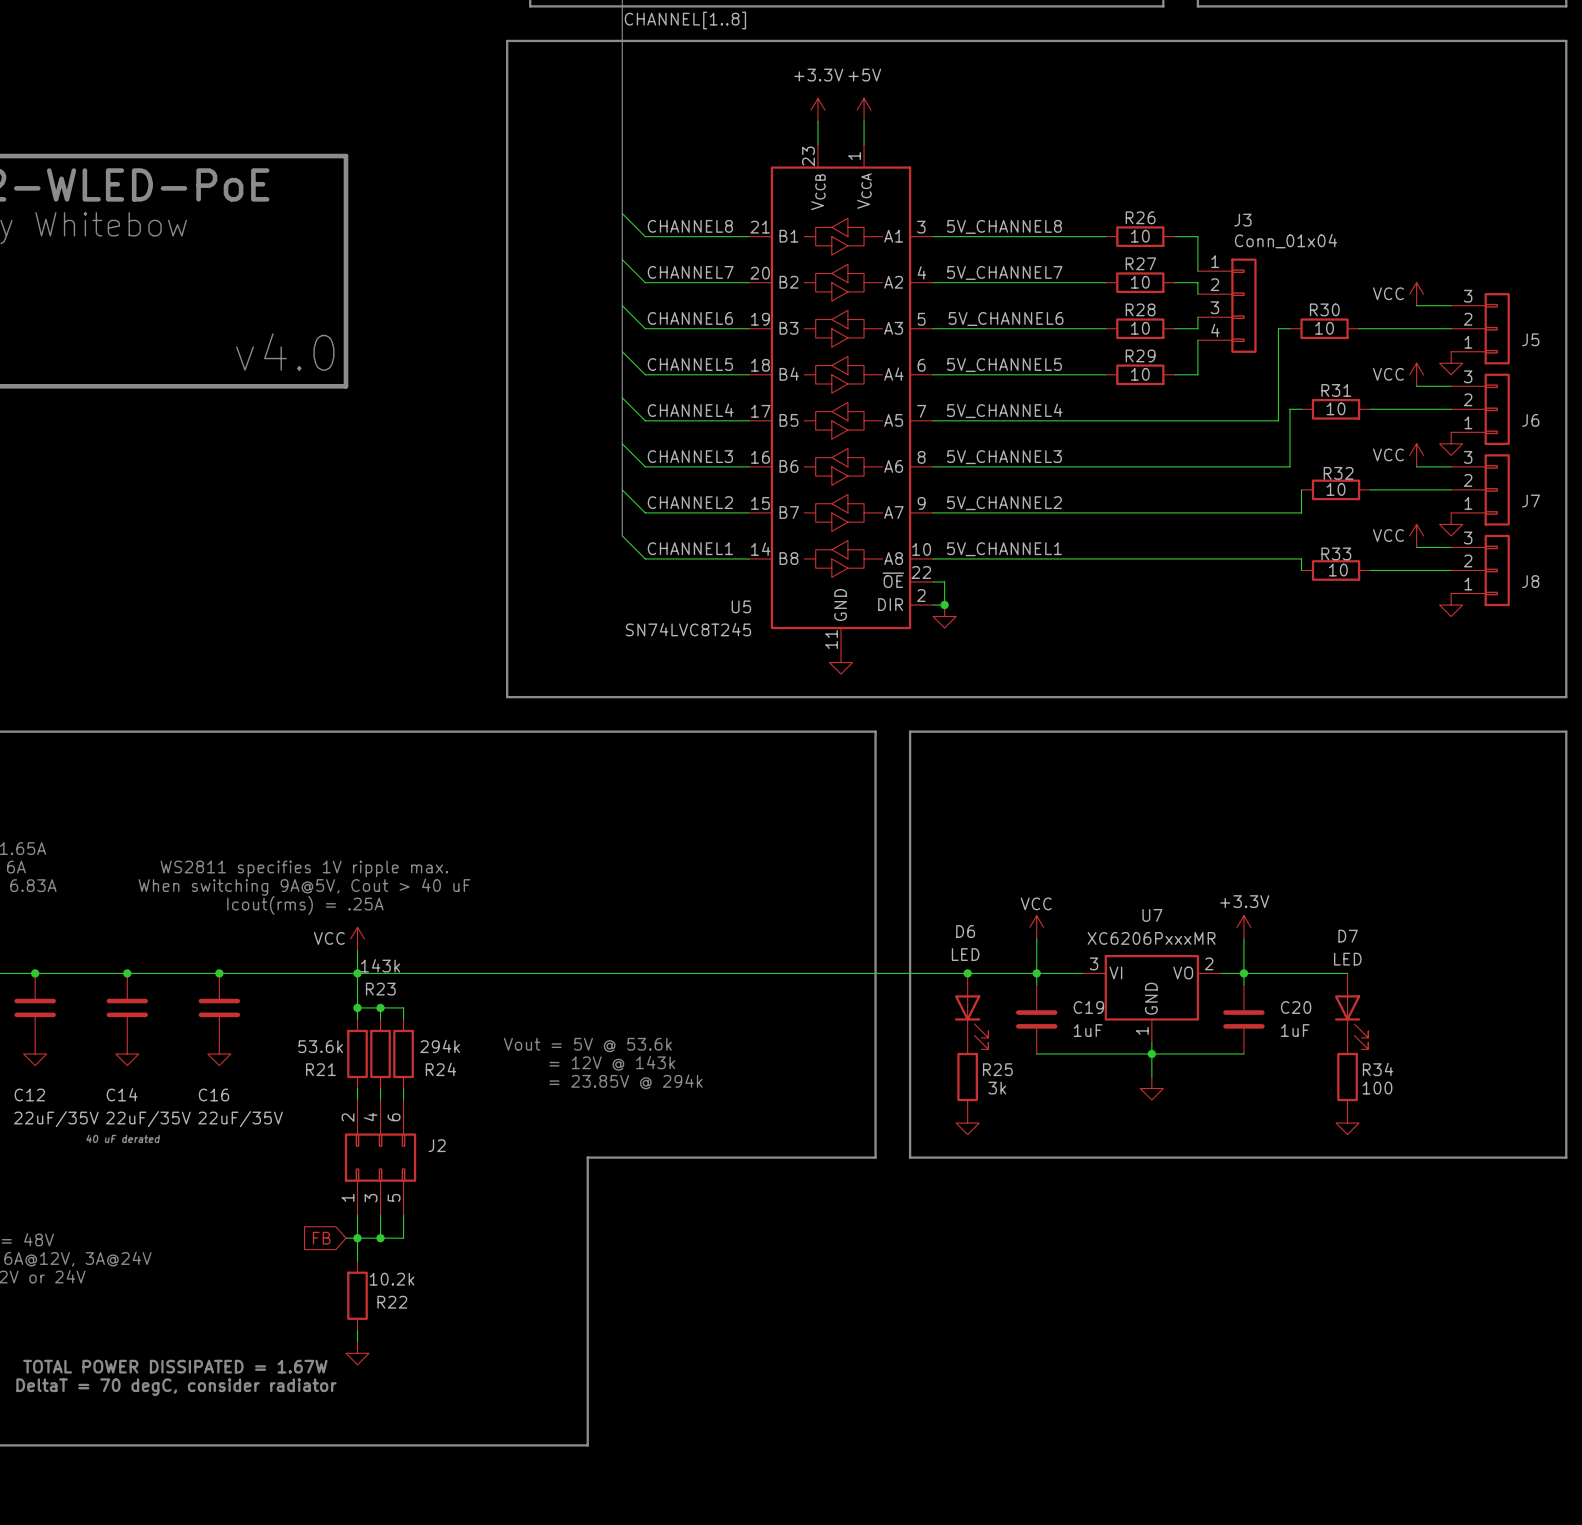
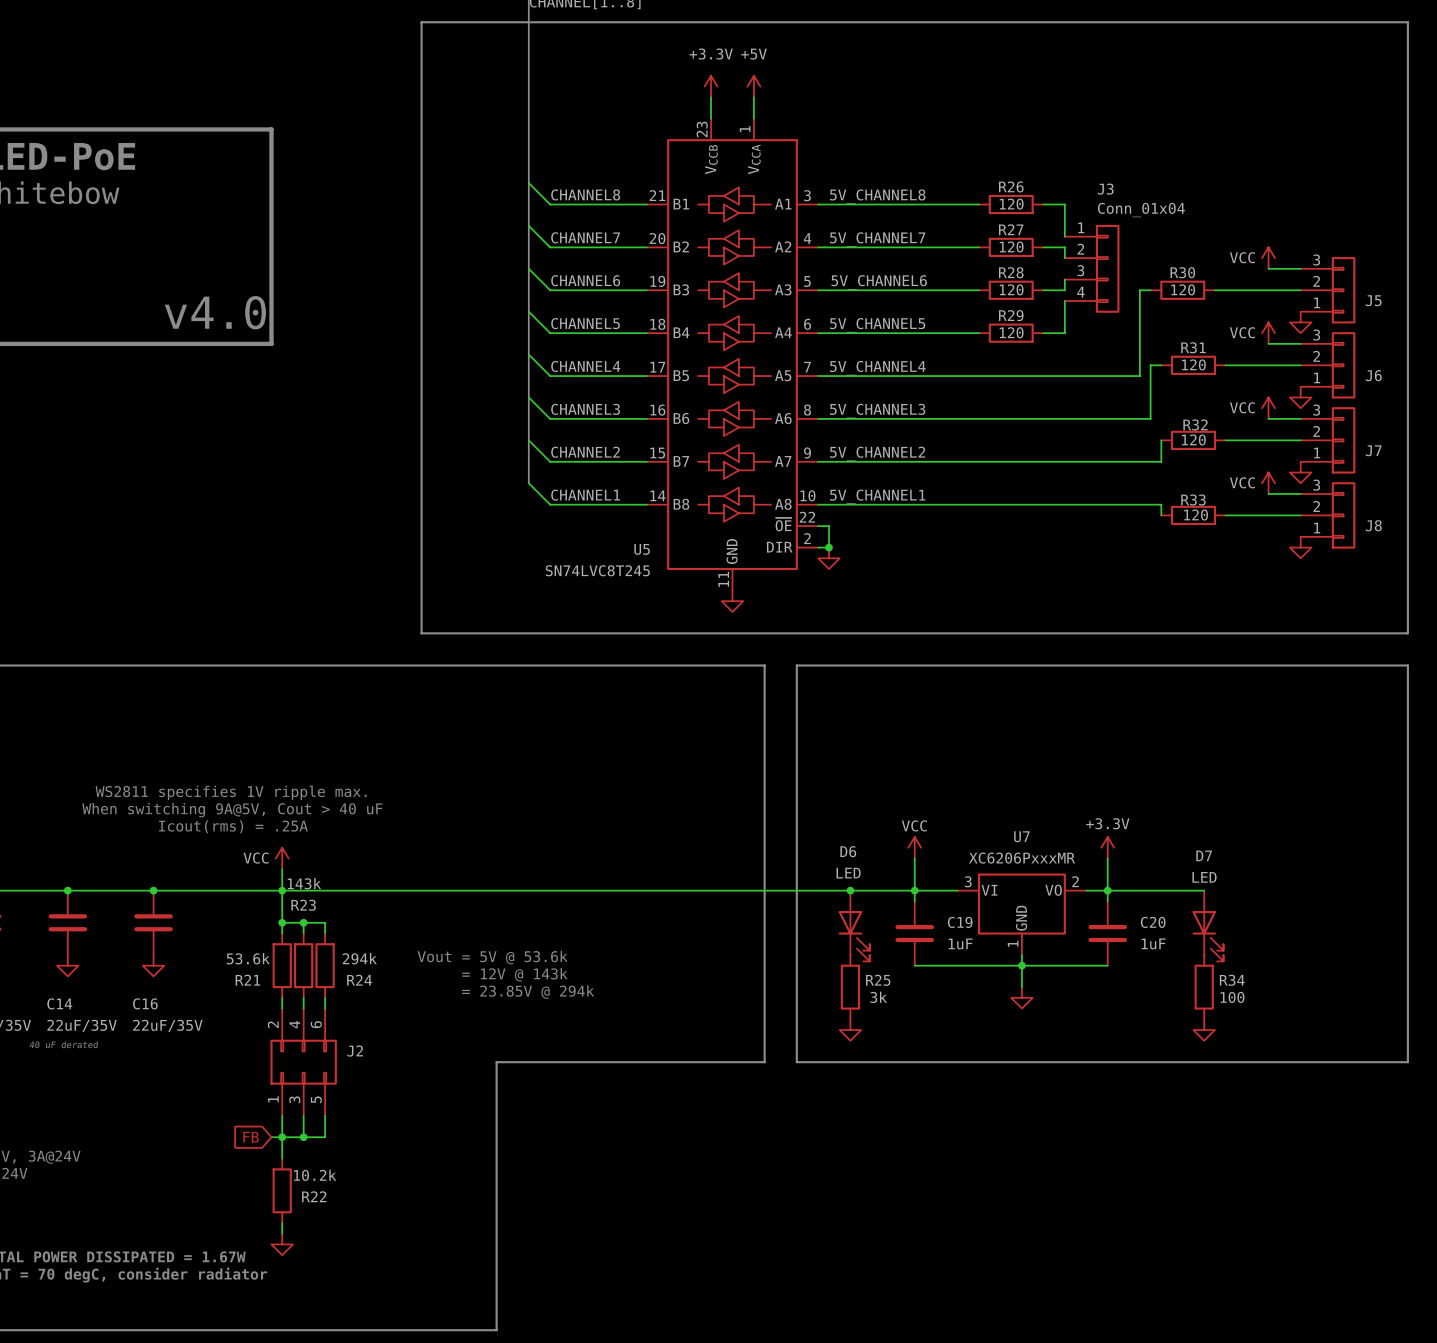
R26 value: 10 (1140, 236) -> 120 (1011, 204)
R27 value: 10 (1140, 282) -> 120 (1011, 247)
R28 value: 10 (1140, 328) -> 120 (1011, 289)
R30 value: 10 (1324, 328) -> 120 (1183, 289)
R29 value: 10 (1140, 374) -> 120 (1011, 332)
R31 value: 10 (1336, 408) -> 120 (1193, 364)
R32 value: 10 (1336, 489) -> 120 (1193, 439)
R33 value: 10 (1338, 570) -> 120 (1196, 515)

